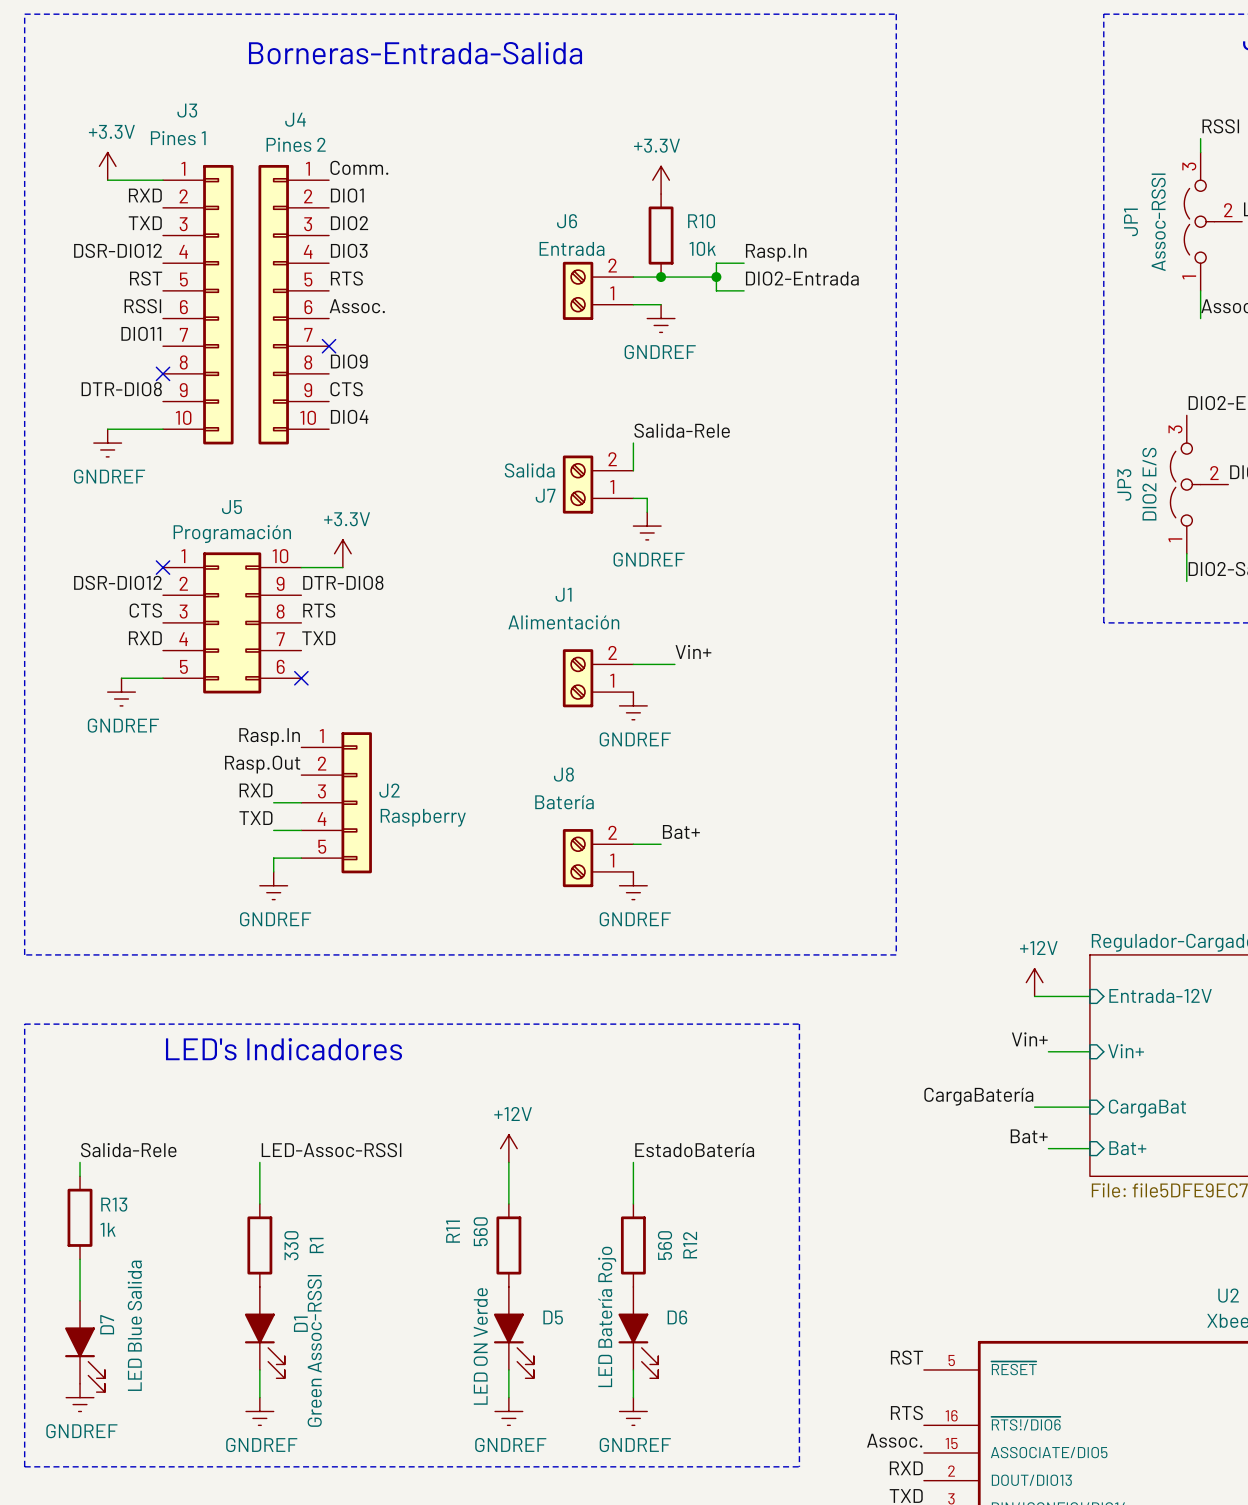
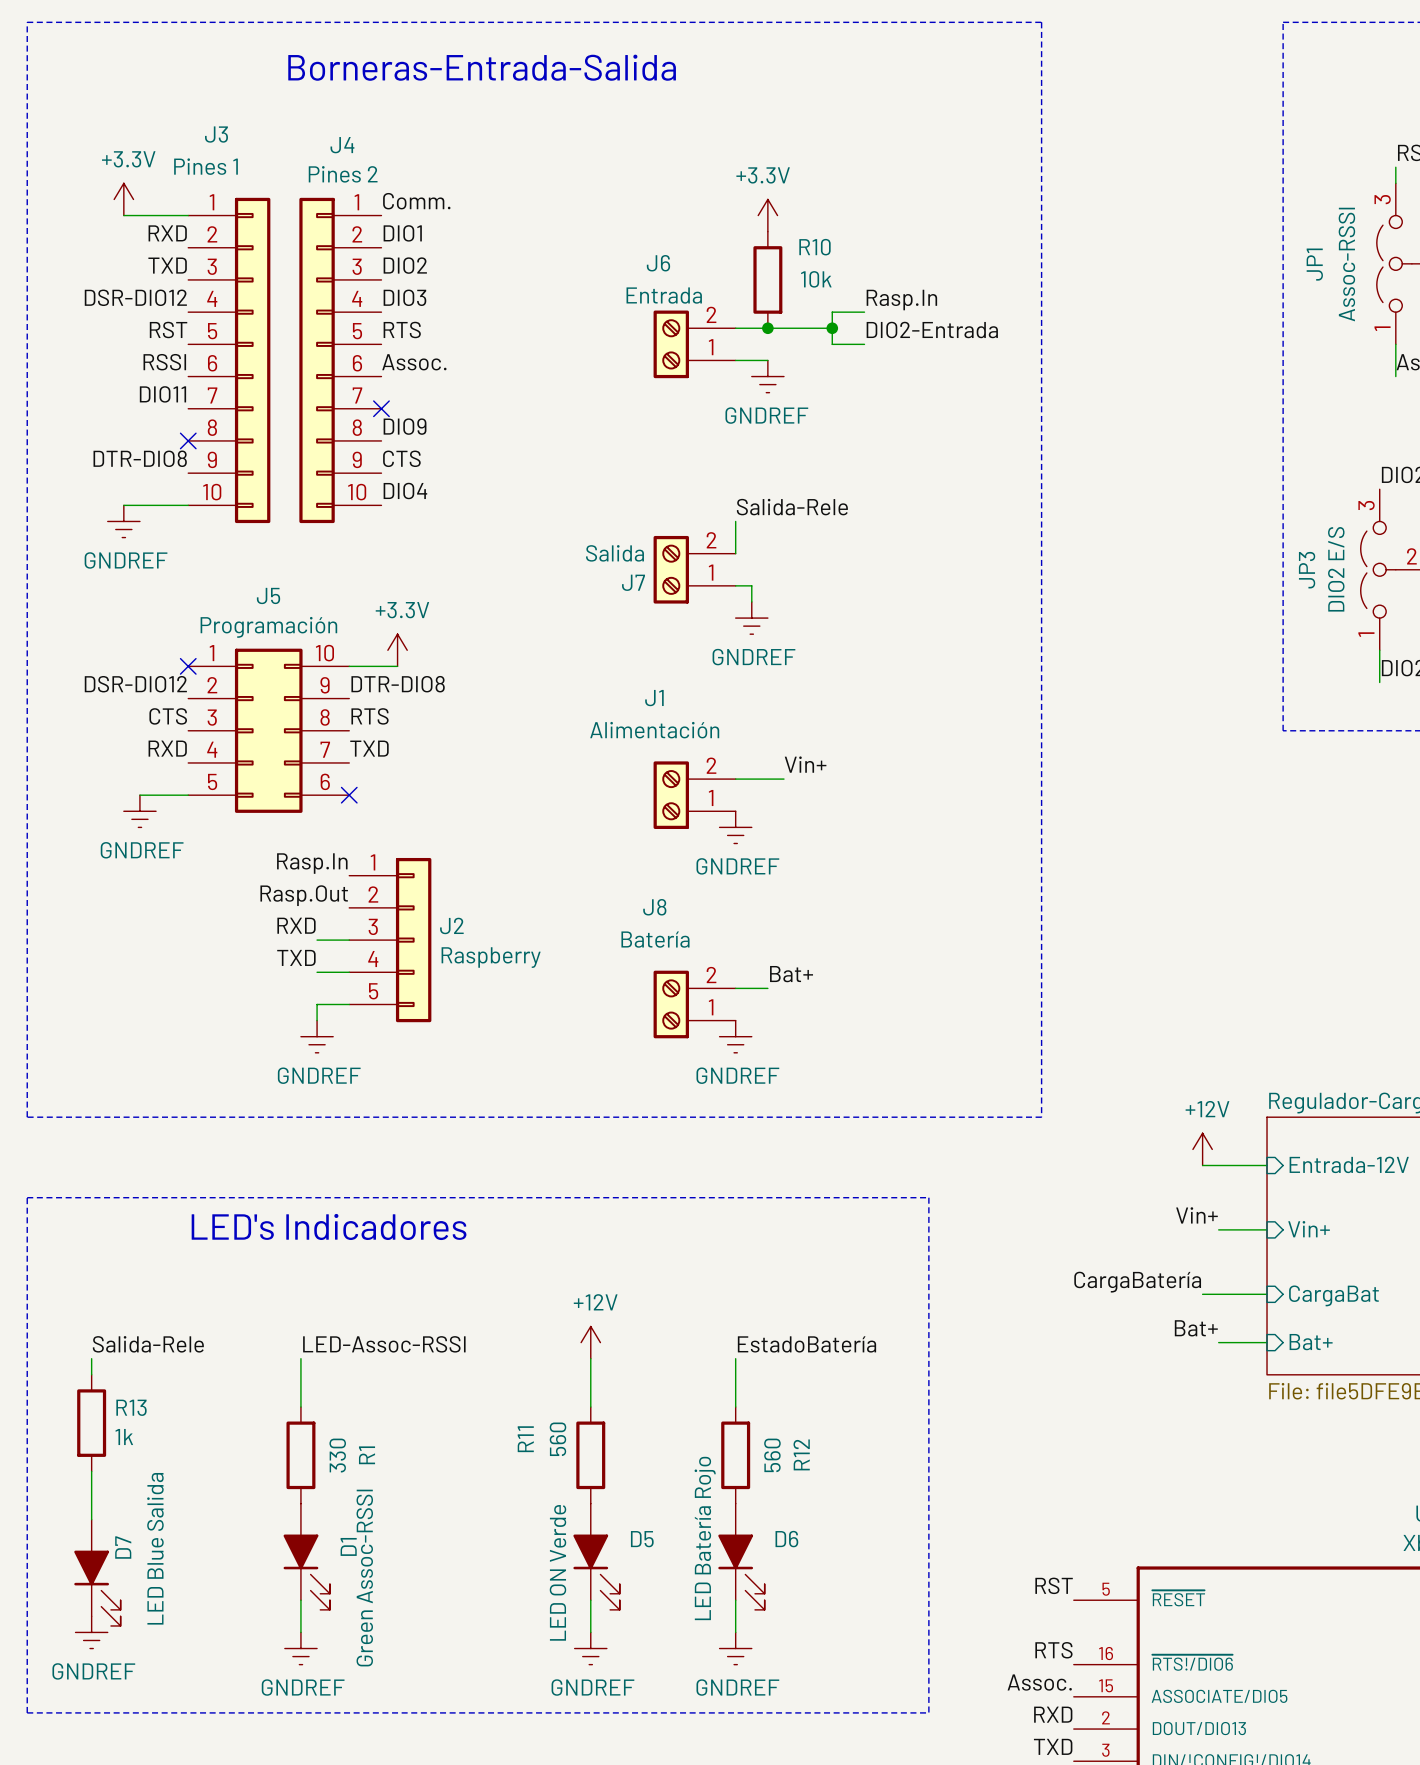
R10 name position: R10 (701, 221) -> R10 (814, 247)
R10 value position: 10k (702, 248) -> 10k (816, 279)

